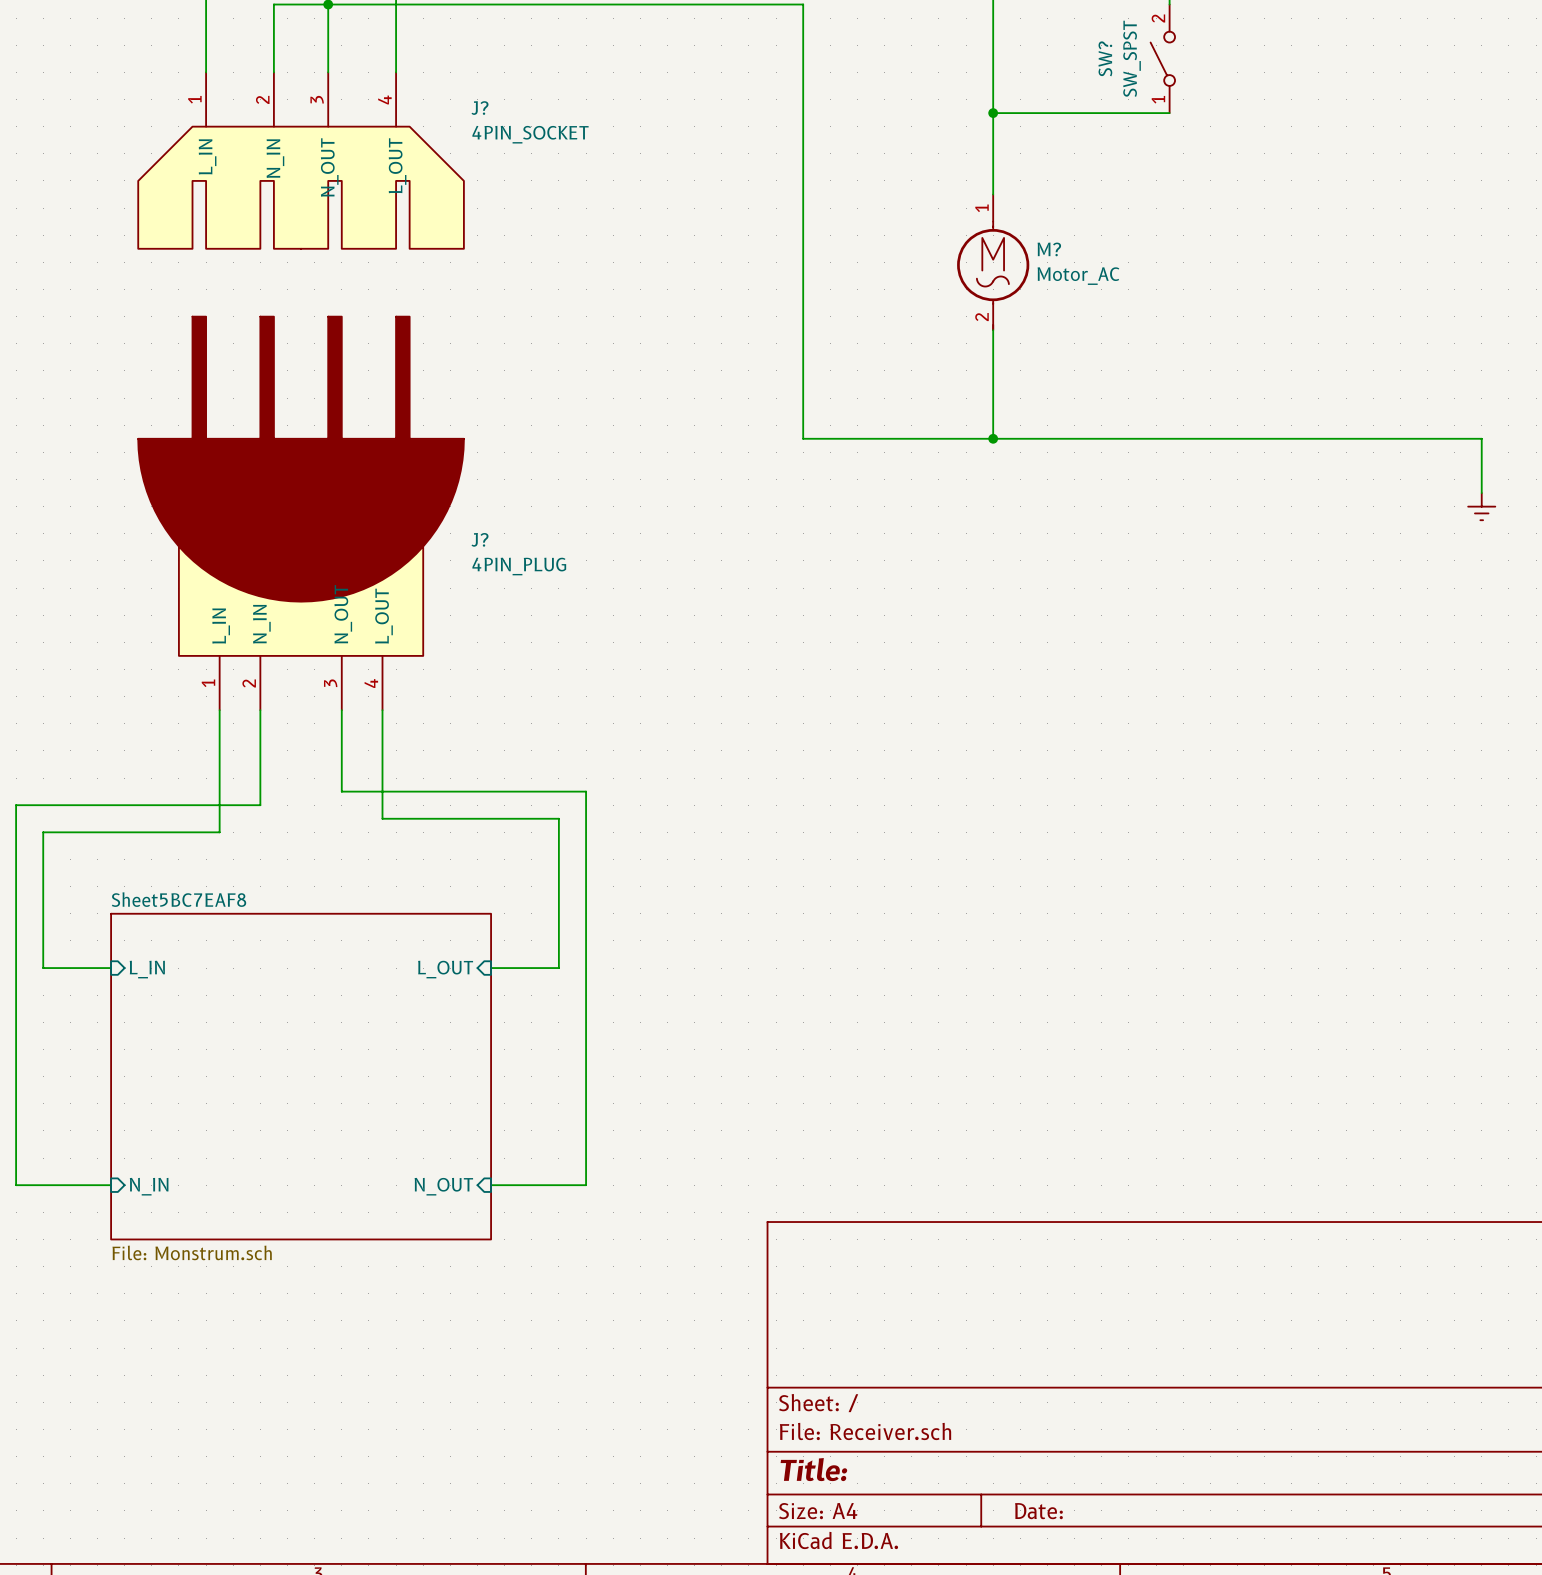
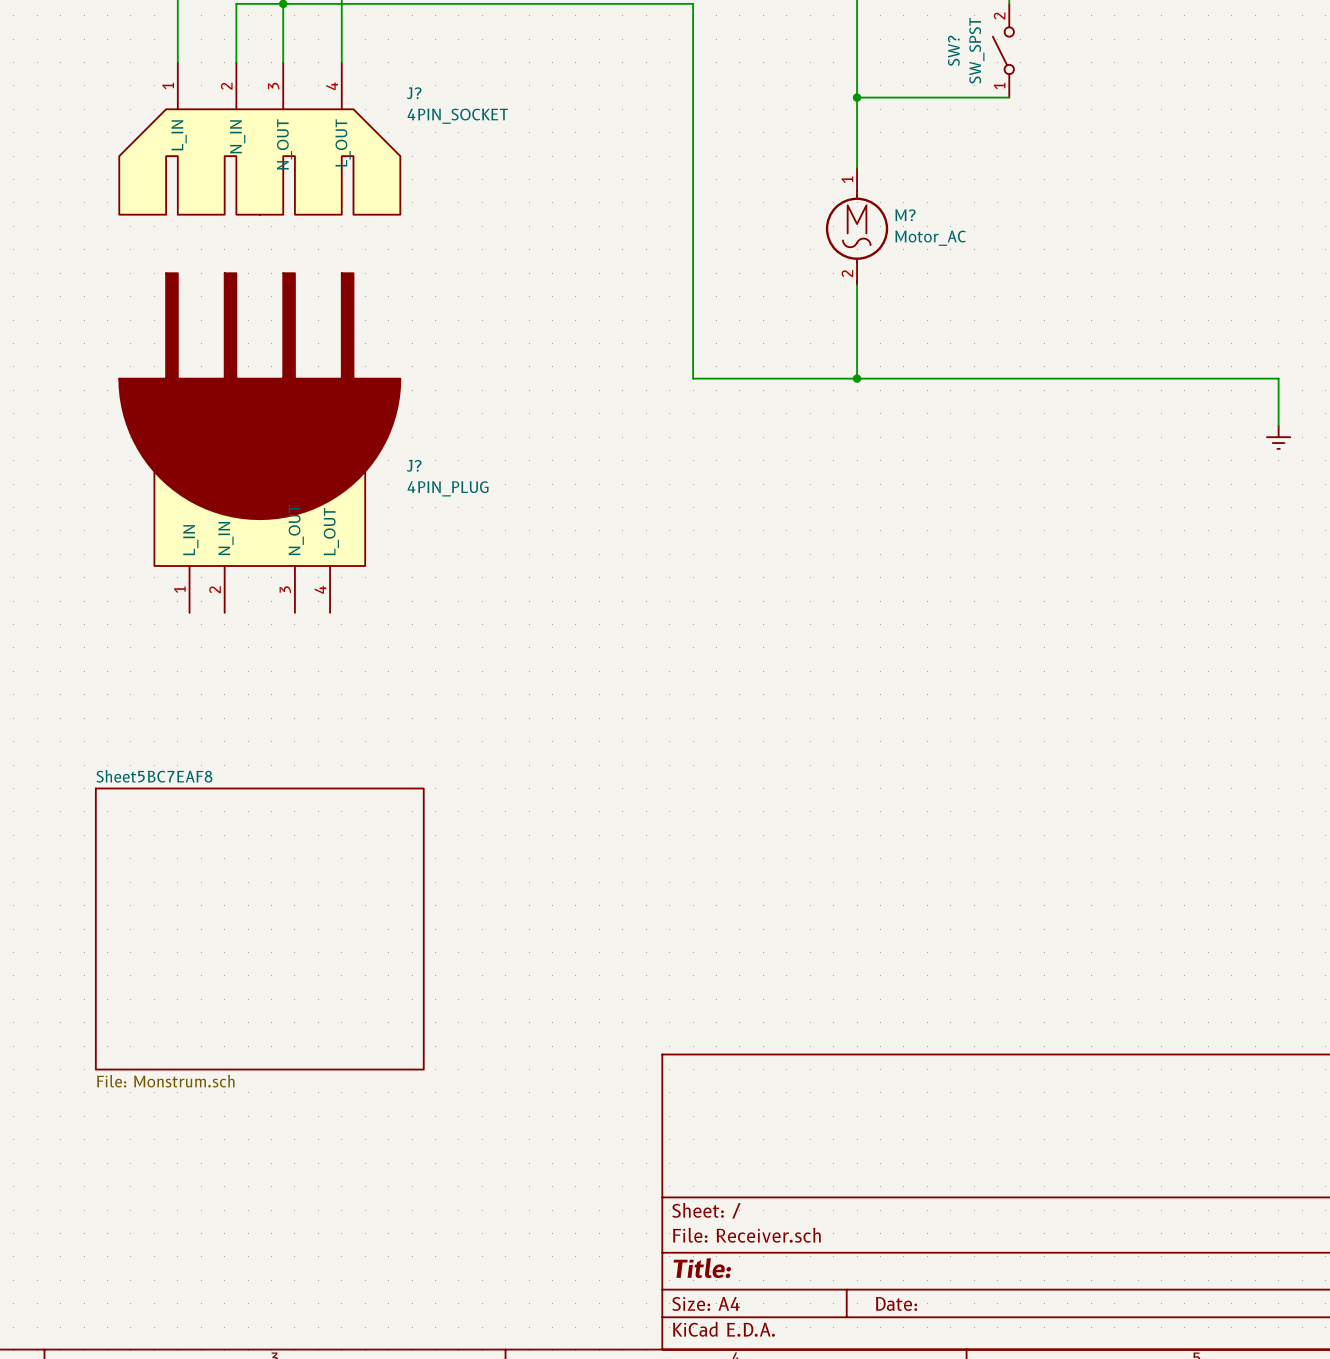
wire: (219, 710) (219, 832) (43, 832) (43, 968) (111, 968) -> none
wire: (260, 710) (260, 805) (16, 805) (16, 1185) (111, 1185) -> none
wire: (341, 710) (341, 791) (586, 791) (586, 1185) (491, 1185) -> none
wire: (382, 710) (382, 818) (558, 818) (558, 968) (491, 968) -> none
sheet pin: L_IN (147, 969) -> none
sheet pin: L_OUT (445, 969) -> none
sheet pin: N_IN (149, 1186) -> none
sheet pin: N_OUT (443, 1186) -> none

